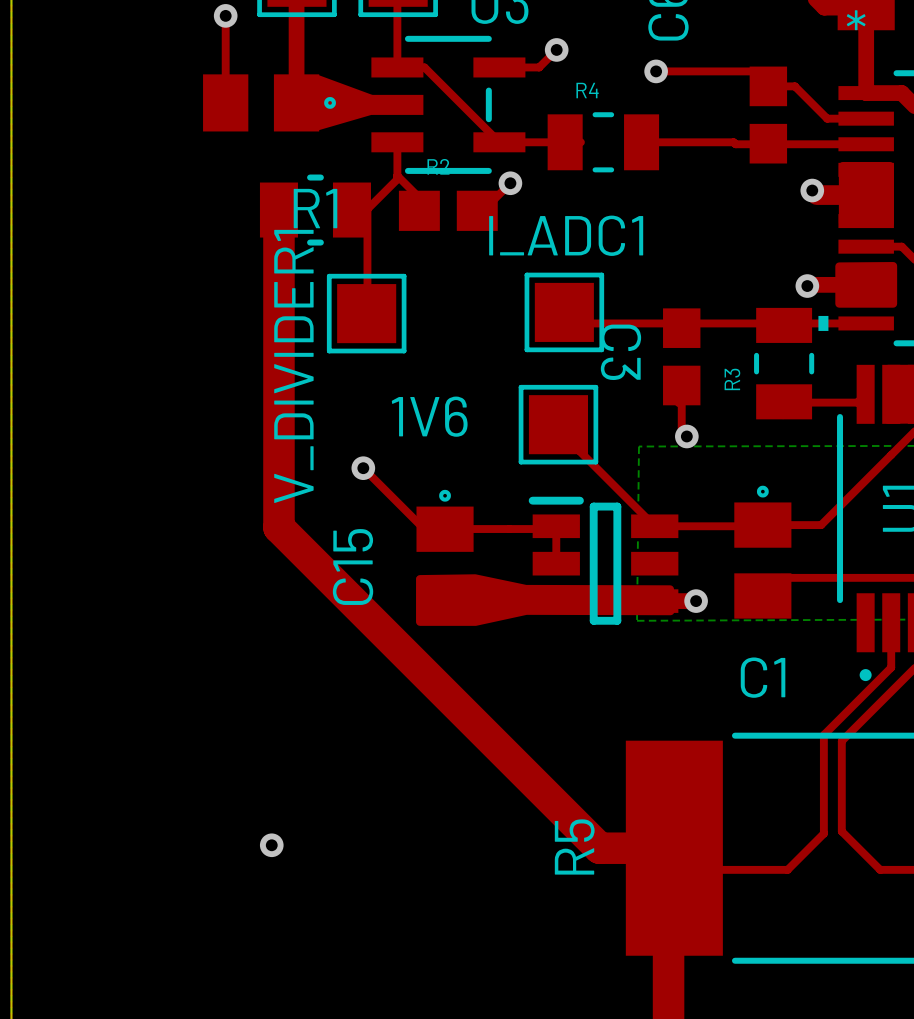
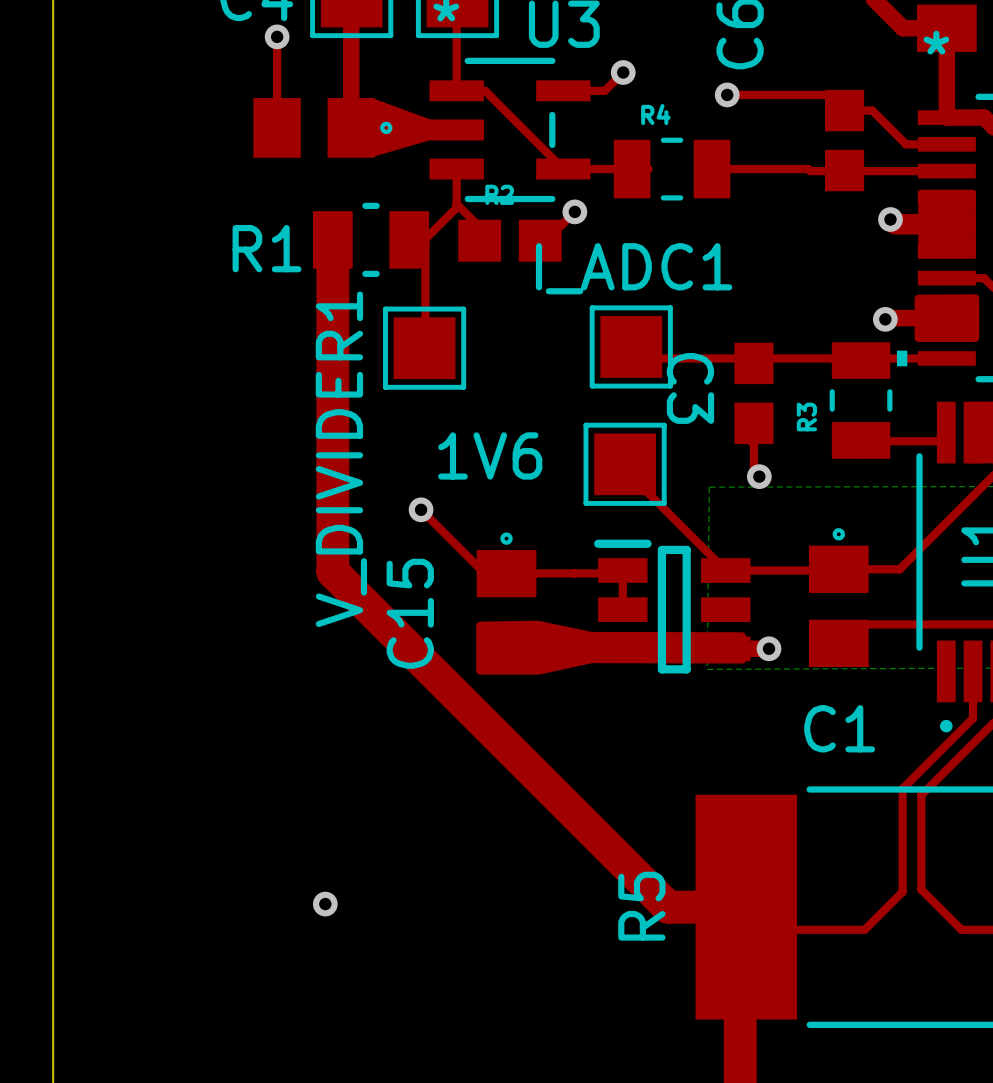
R1 name position: R1 (315, 208) -> R1 (267, 248)
V_DIVIDER1 name position: V_DIVIDER1 (293, 366) -> V_DIVIDER1 (341, 459)

